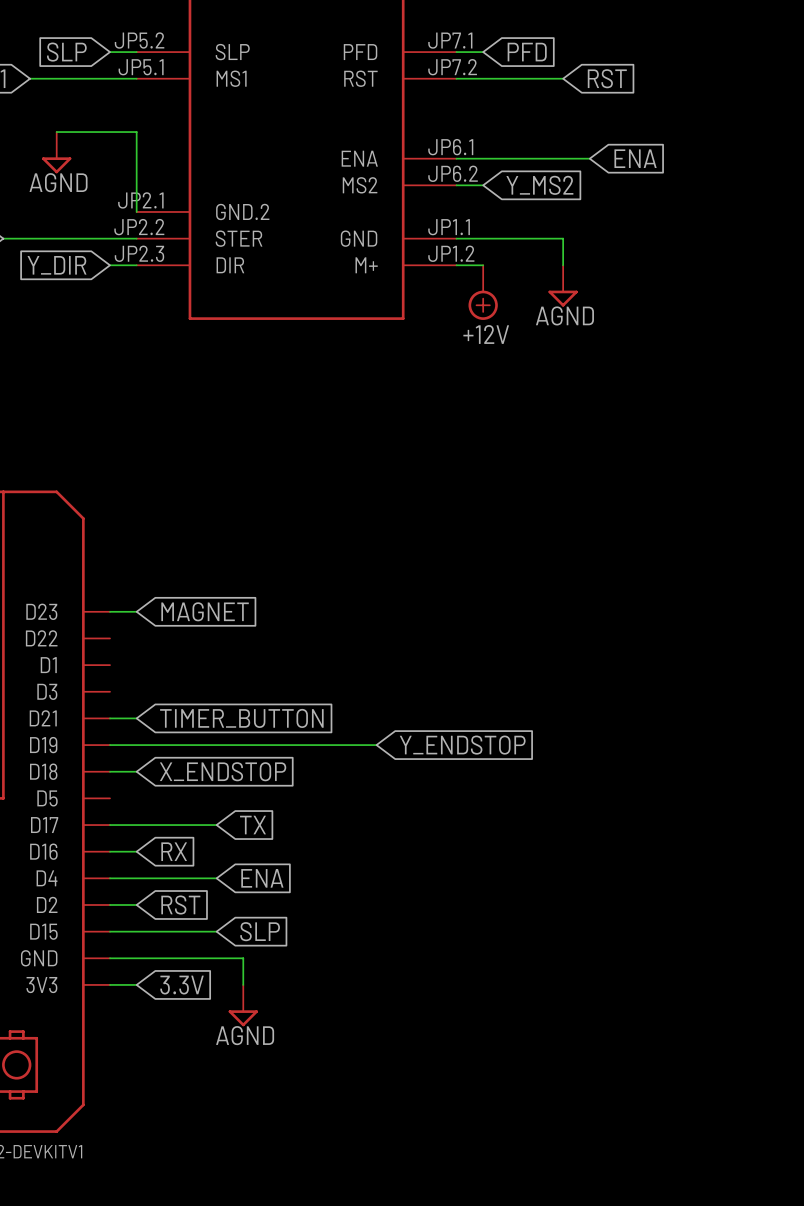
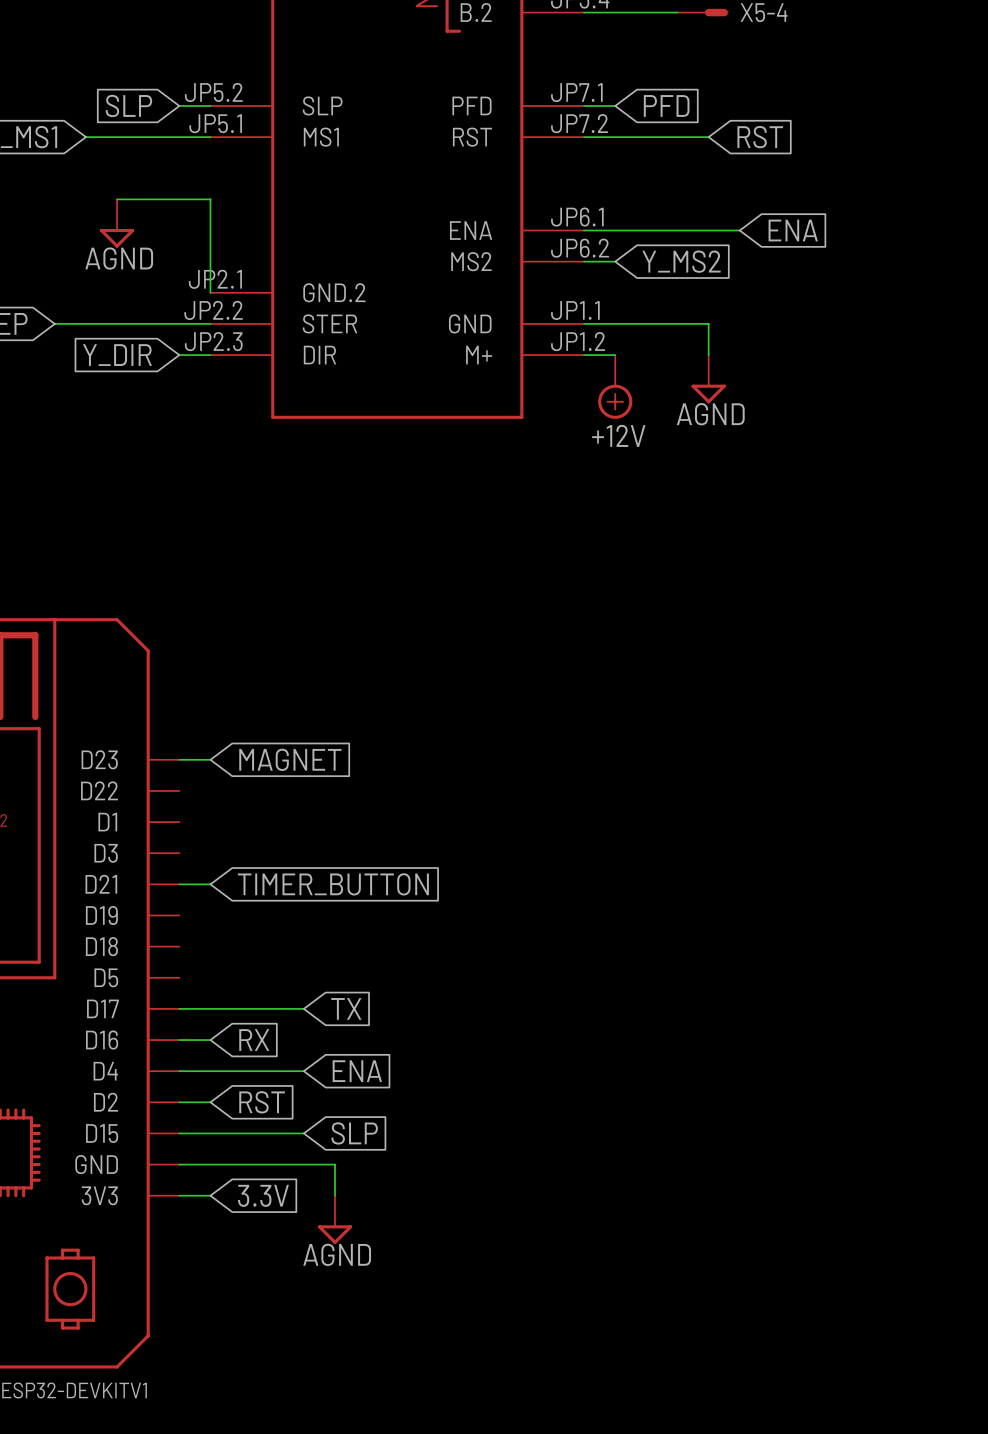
wire: (110, 745) (376, 745) -> none
global label: Y_ENDSTOP (462, 745) -> none
wire: (110, 771) (136, 771) -> none
global label: X_ENDSTOP (223, 771) -> none

